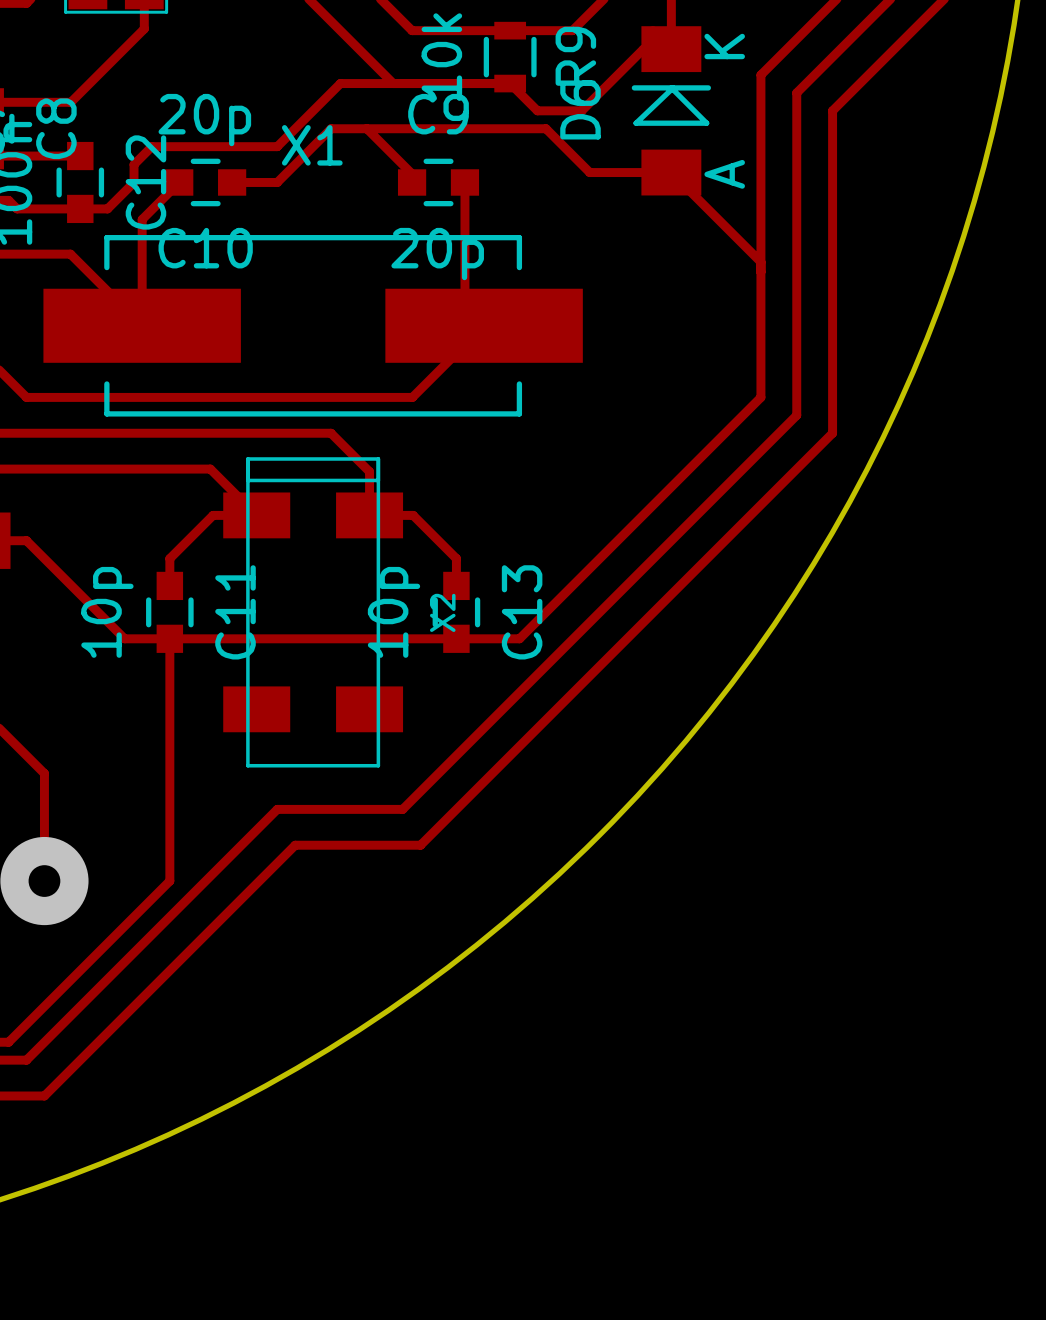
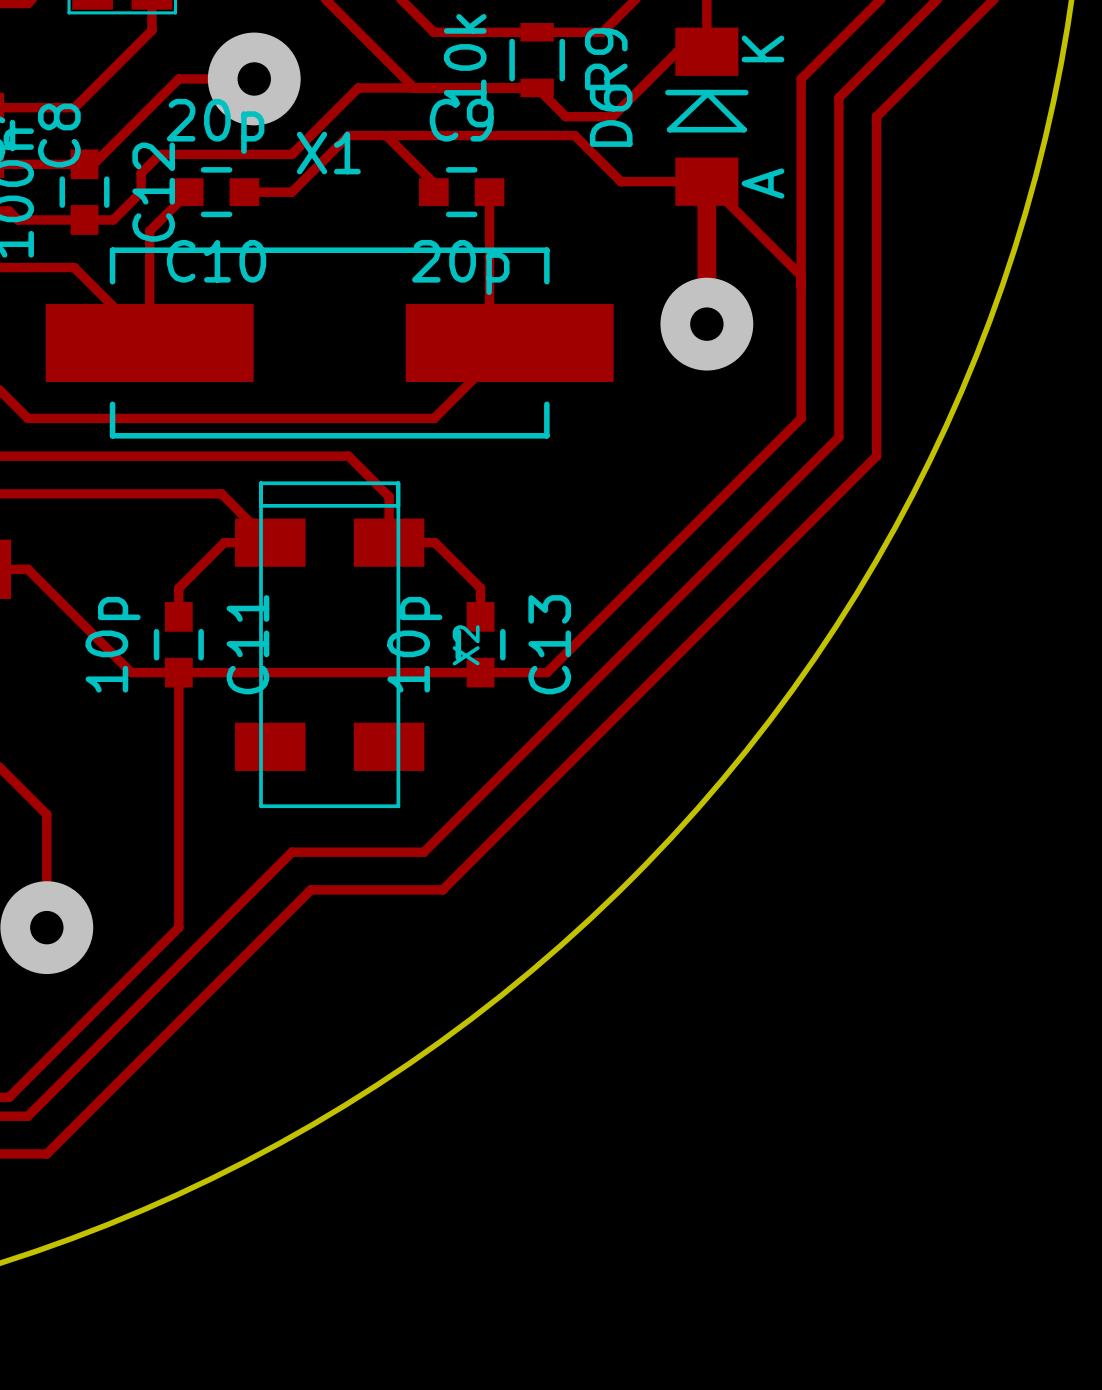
track: none -> (254, 78) (178, 78) (93, 164) (84, 164)
via: none -> (254, 78)
track: none -> (706, 181) (706, 324)
via: none -> (706, 324)

